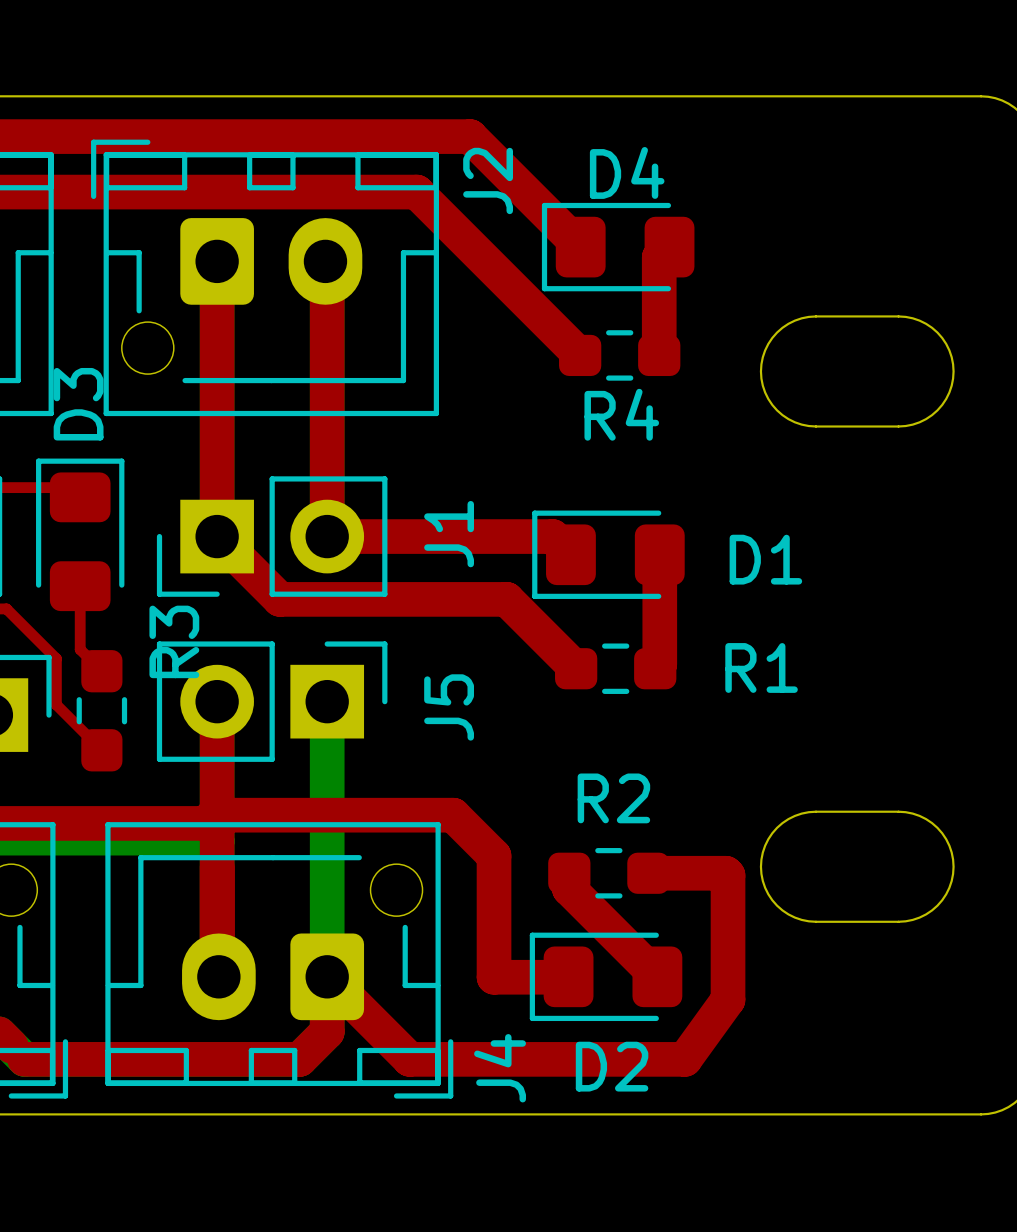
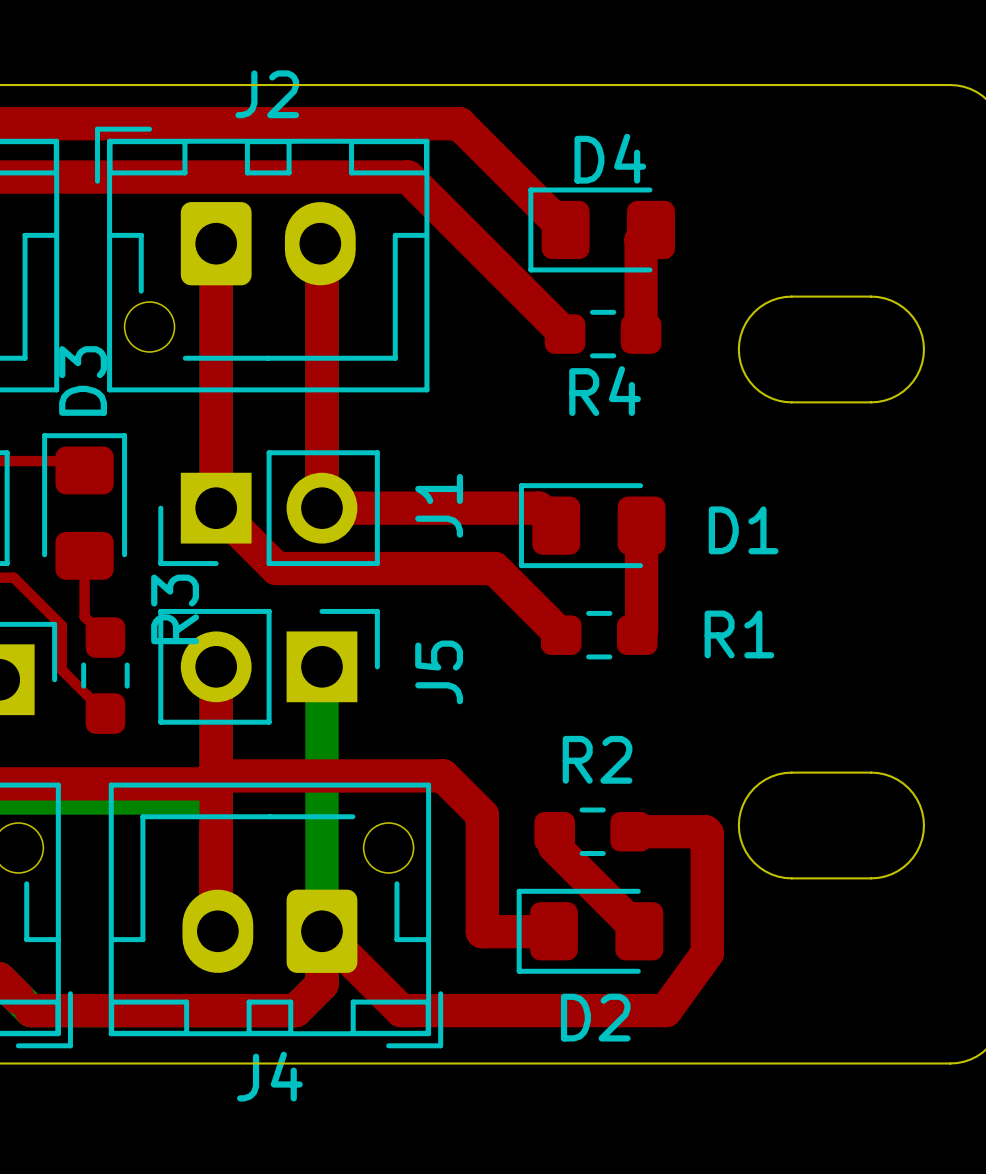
J2 name rotation: 0° (488, 180) -> 90° clockwise (267, 94)
J2 name position: J2 (488, 180) -> J2 (267, 94)
J4 name rotation: 0° (500, 1068) -> 90° clockwise (269, 1076)
J4 name position: J4 (500, 1068) -> J4 (269, 1076)

